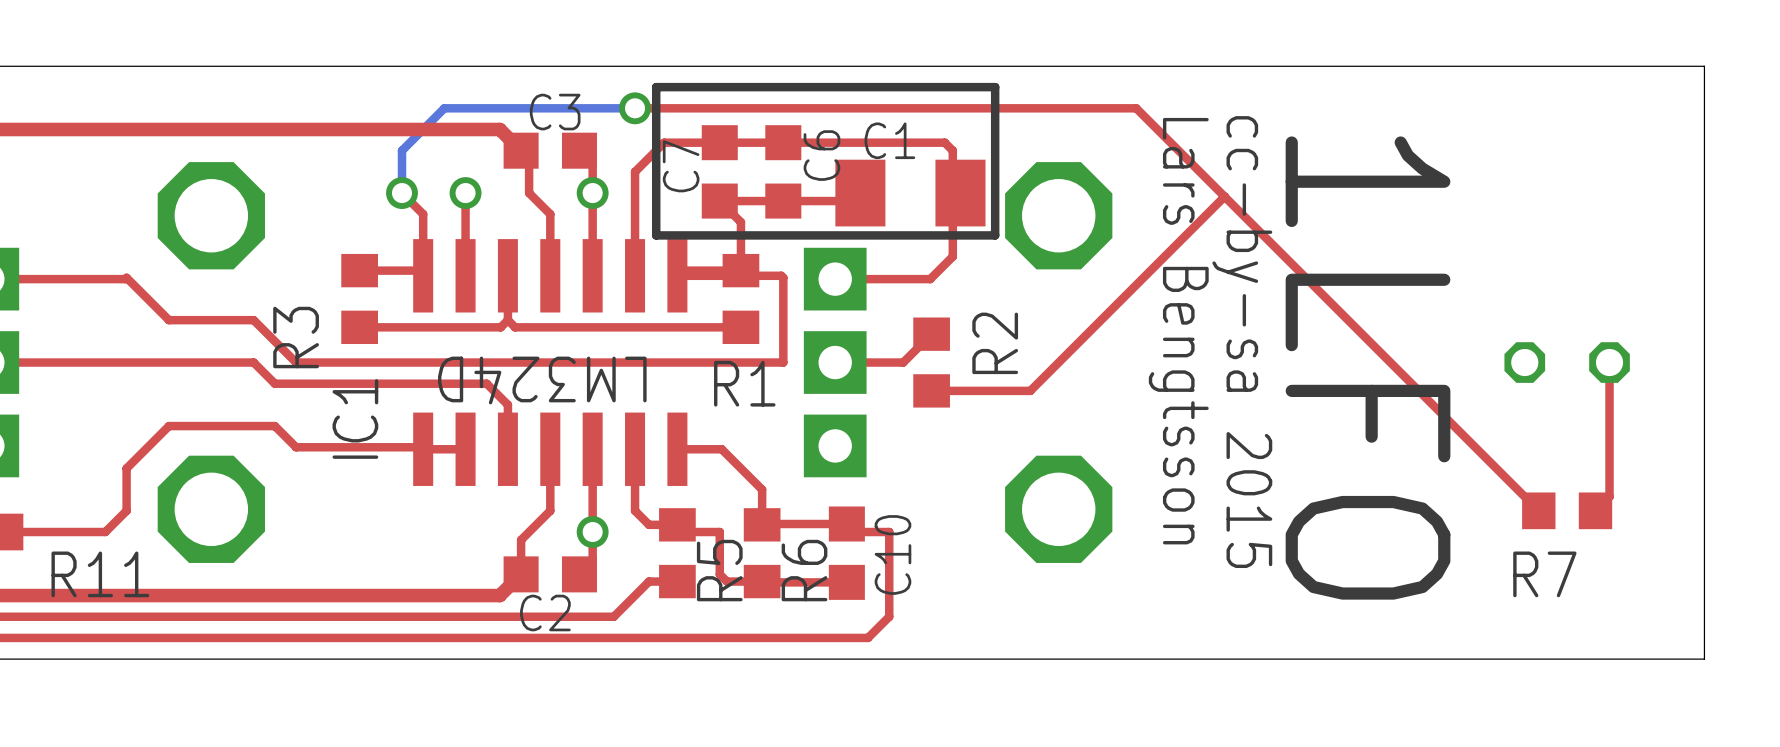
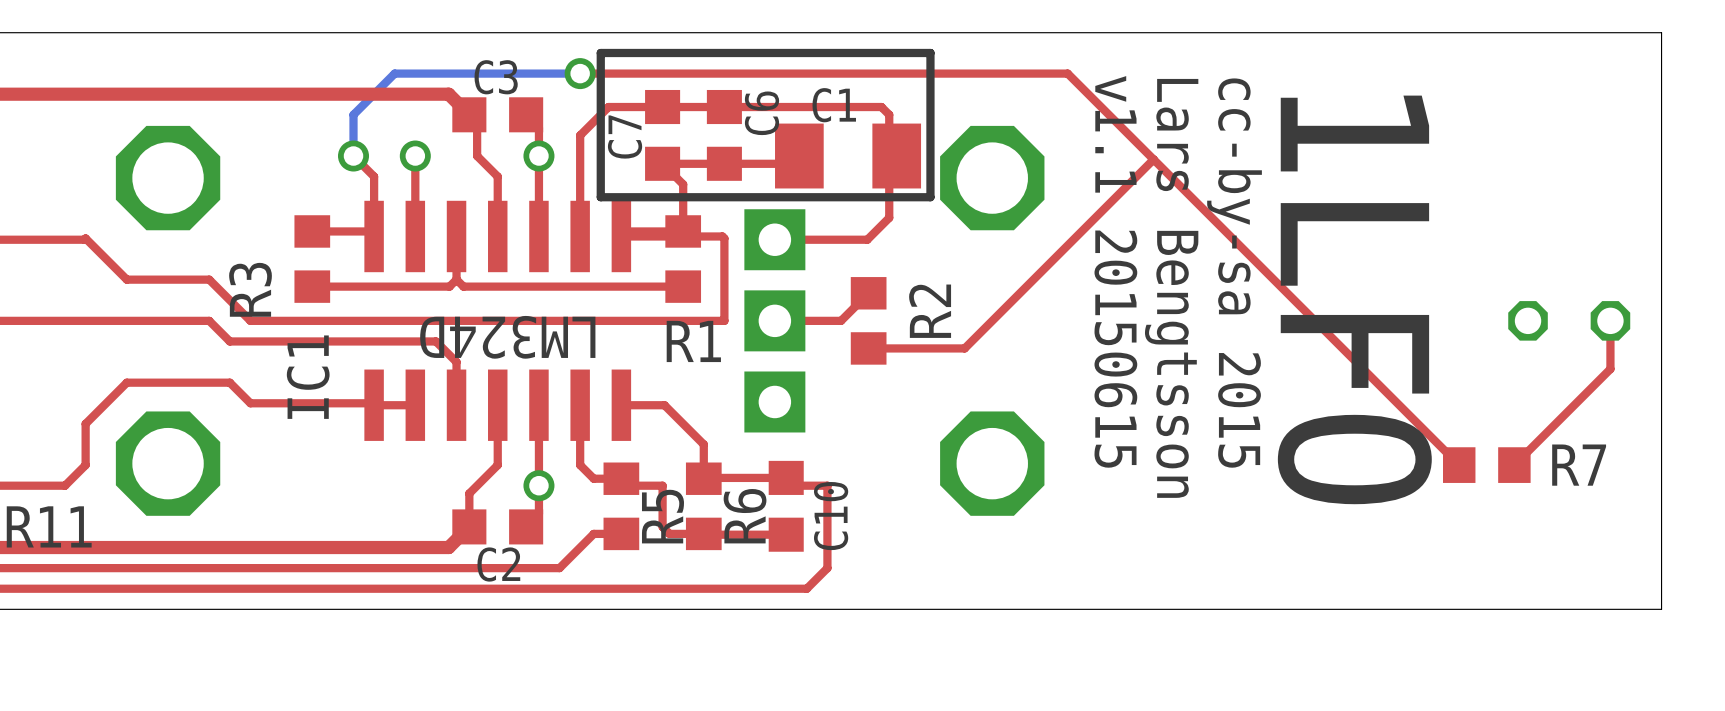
board edge: (1704, 66) (1704, 659) -> (1620, 32) (1661, 32) (1661, 609) (1620, 609)
text: Lars Bengtsson (1178, 331) -> v1.1 20150615 (1115, 271)
text: cc-by-sa 2015 (1242, 342) -> Lars Bengtsson (1171, 288)
part position: (1567, 362) -> (1569, 320)
top track: (1609, 362) (1609, 496) -> (1610, 320) (1610, 369) (1528, 451)
text: 1LFO (1368, 368) -> cc-by-sa 2015 (1234, 273)
text: none -> 1LFO (1354, 299)
R7 name position: R7 (1544, 574) -> R7 (1579, 465)

